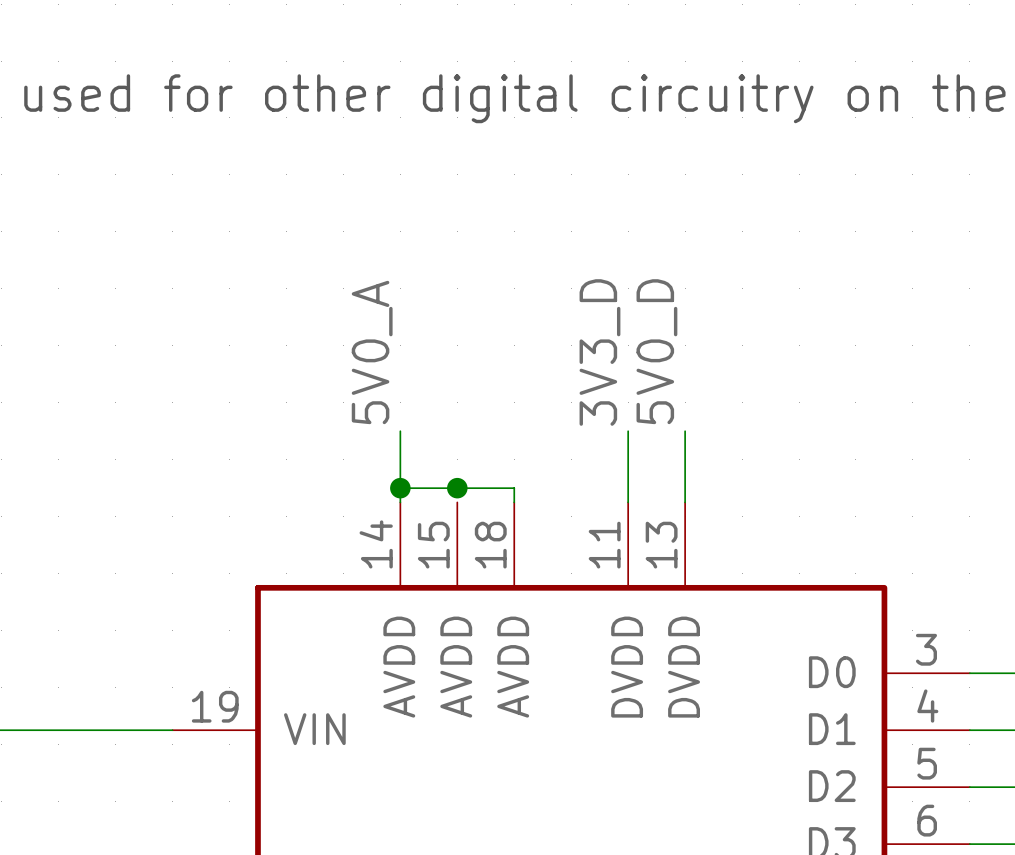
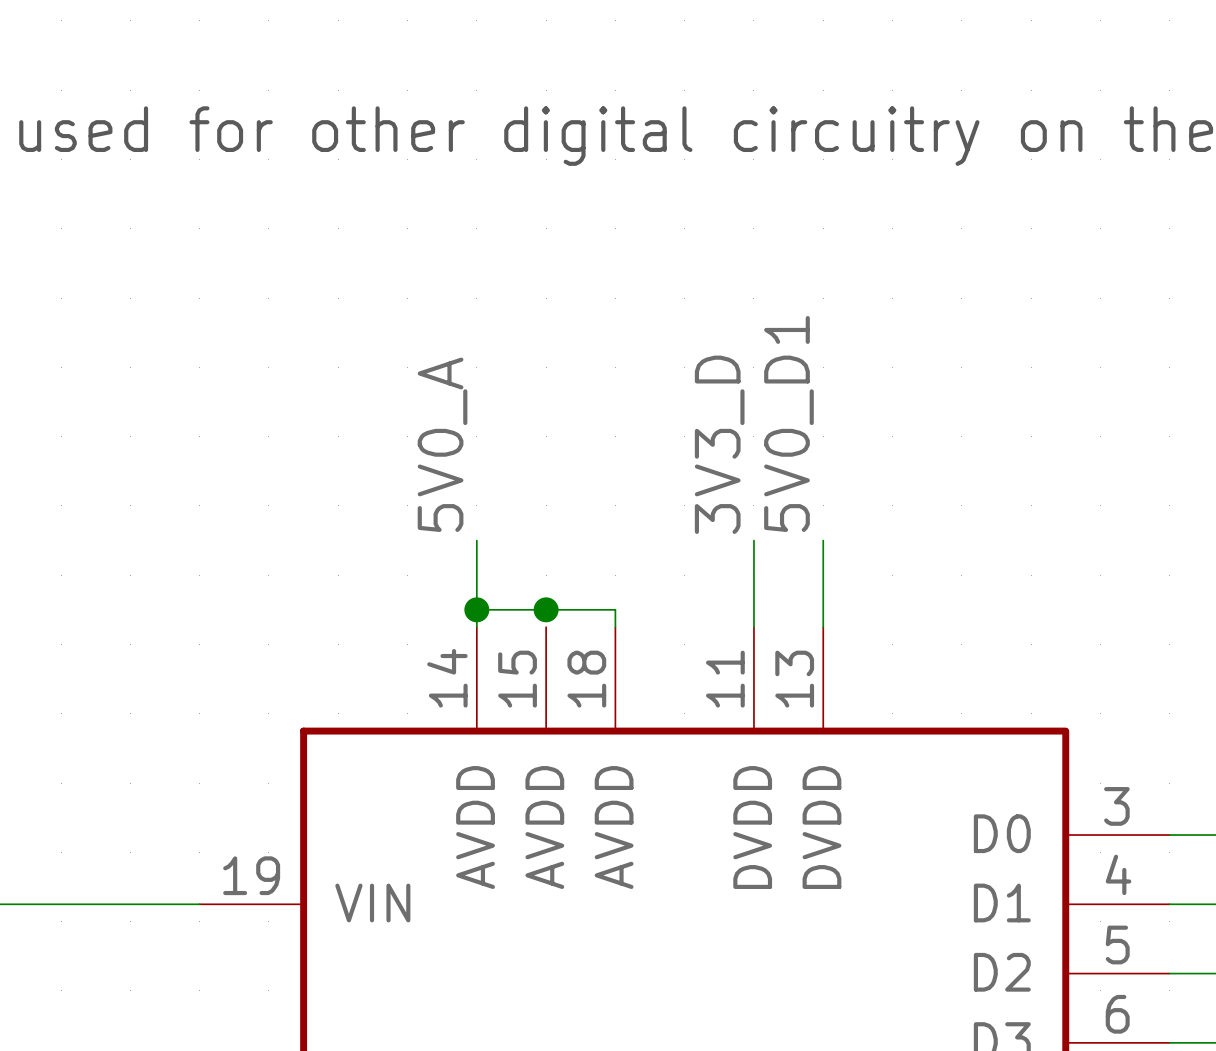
label: 5V0_D (656, 351) -> 5V0_D1 (788, 423)

